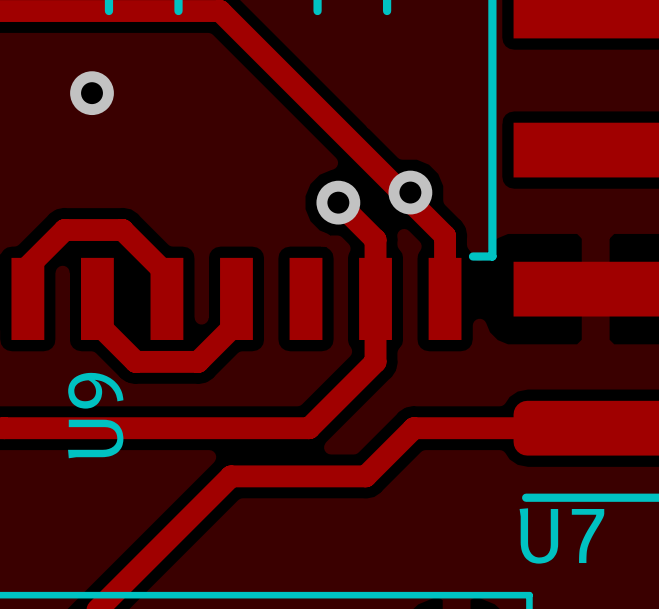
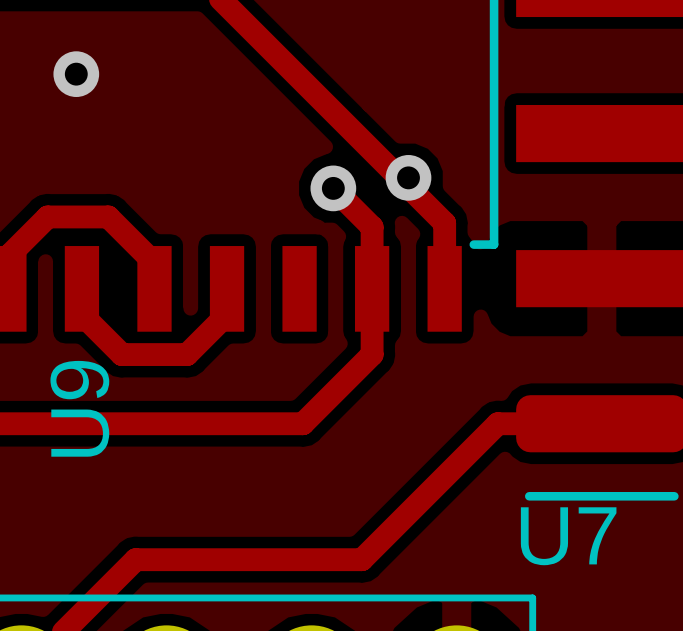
track: (496, 428) (413, 428) (365, 476) (231, 476) (148, 558) -> (497, 423) (361, 559) (135, 559)

